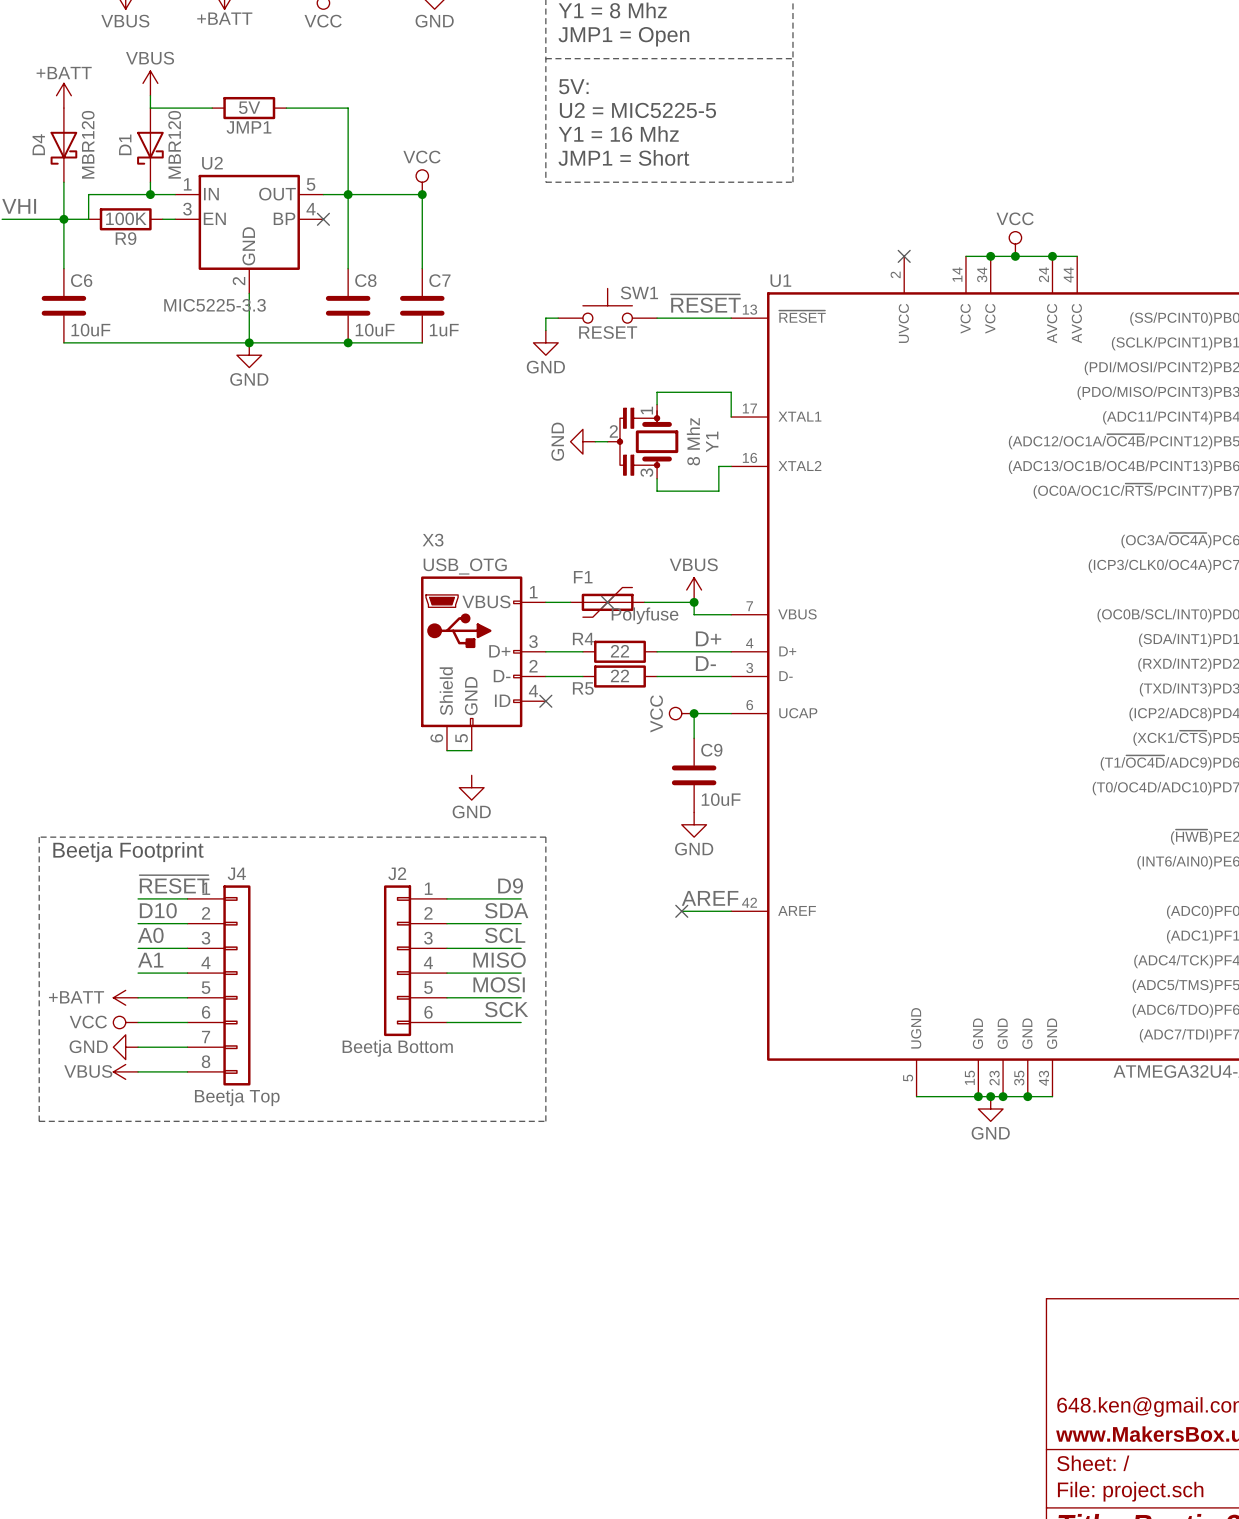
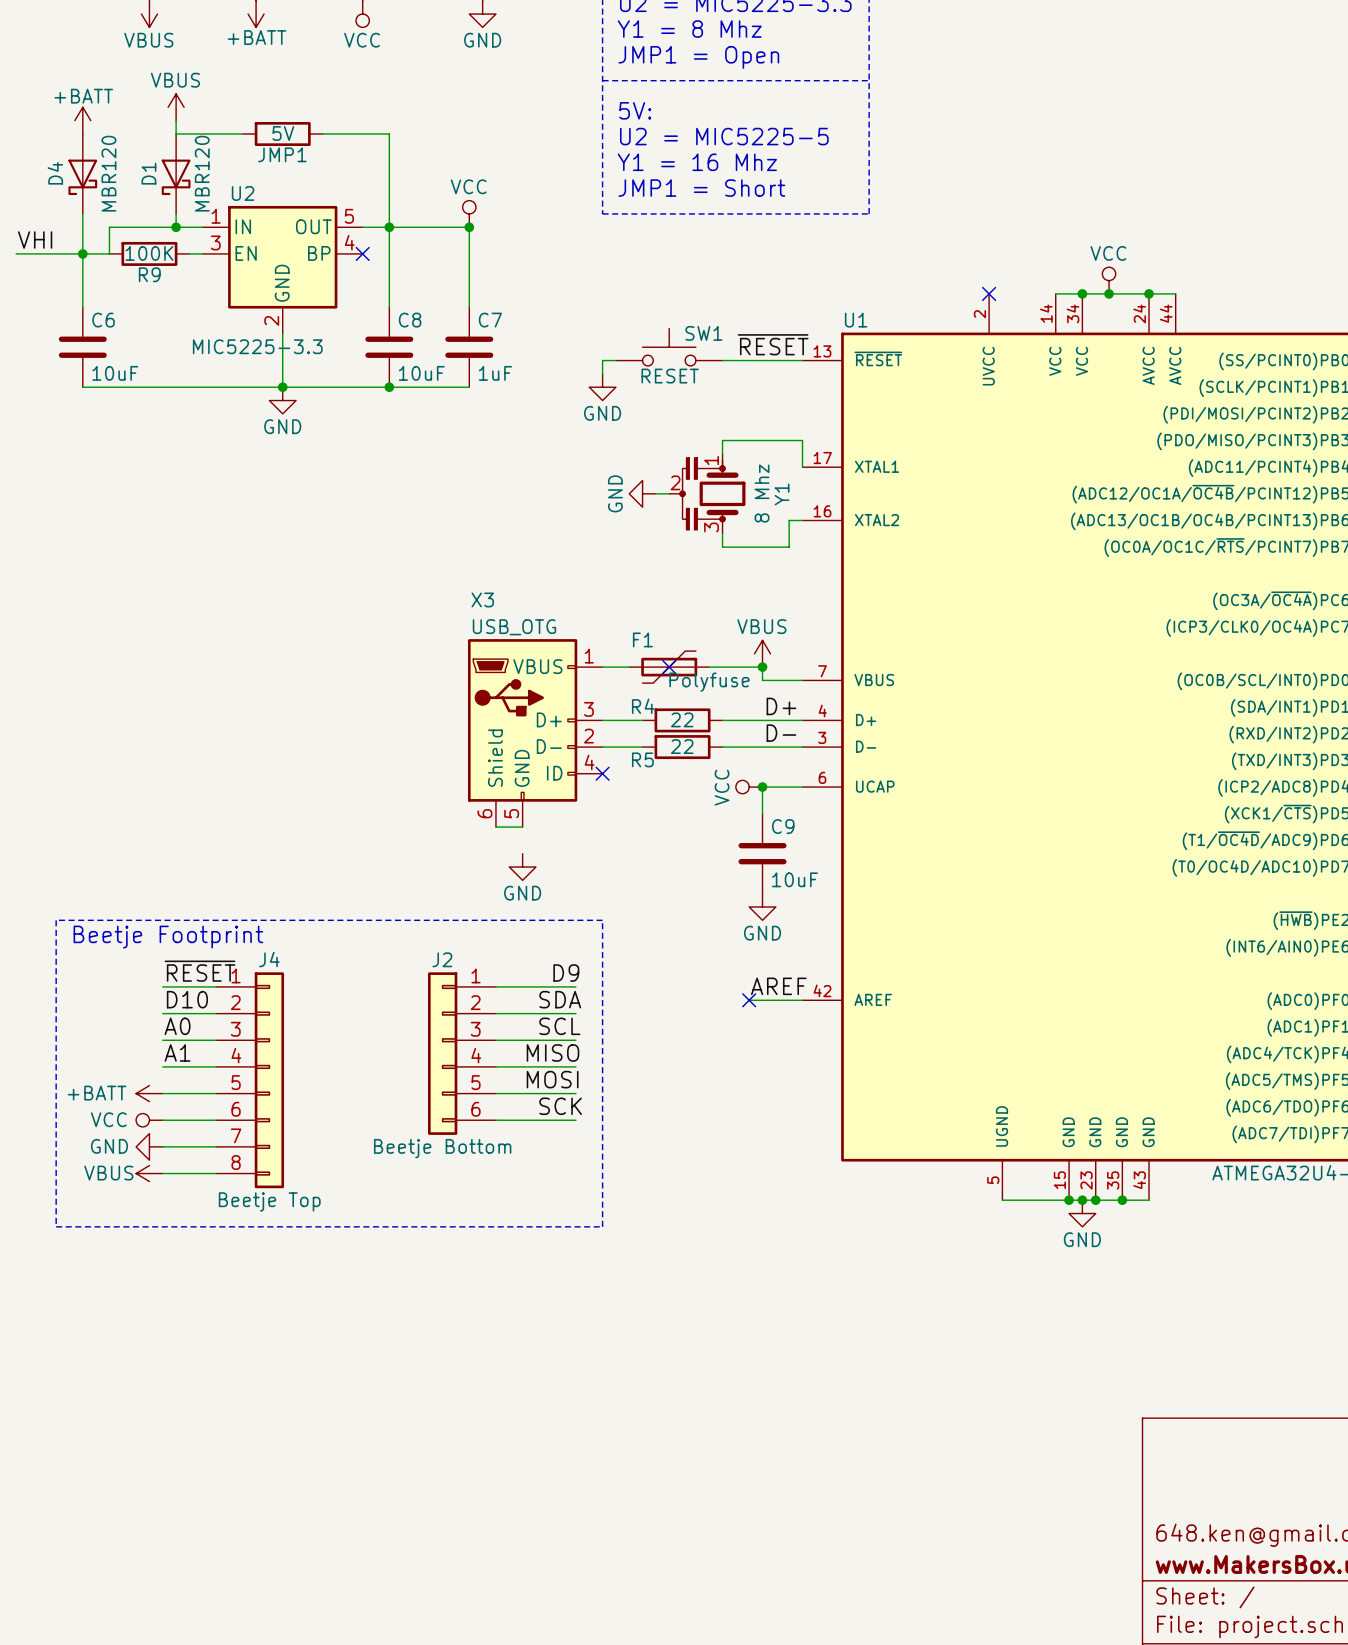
text: Beetja Footprint (128, 852) -> Beetje Footprint (168, 937)
J2 value: Beetja Bottom (397, 1048) -> Beetje Bottom (442, 1148)
J4 value: Beetja Top (237, 1097) -> Beetje Top (269, 1201)

